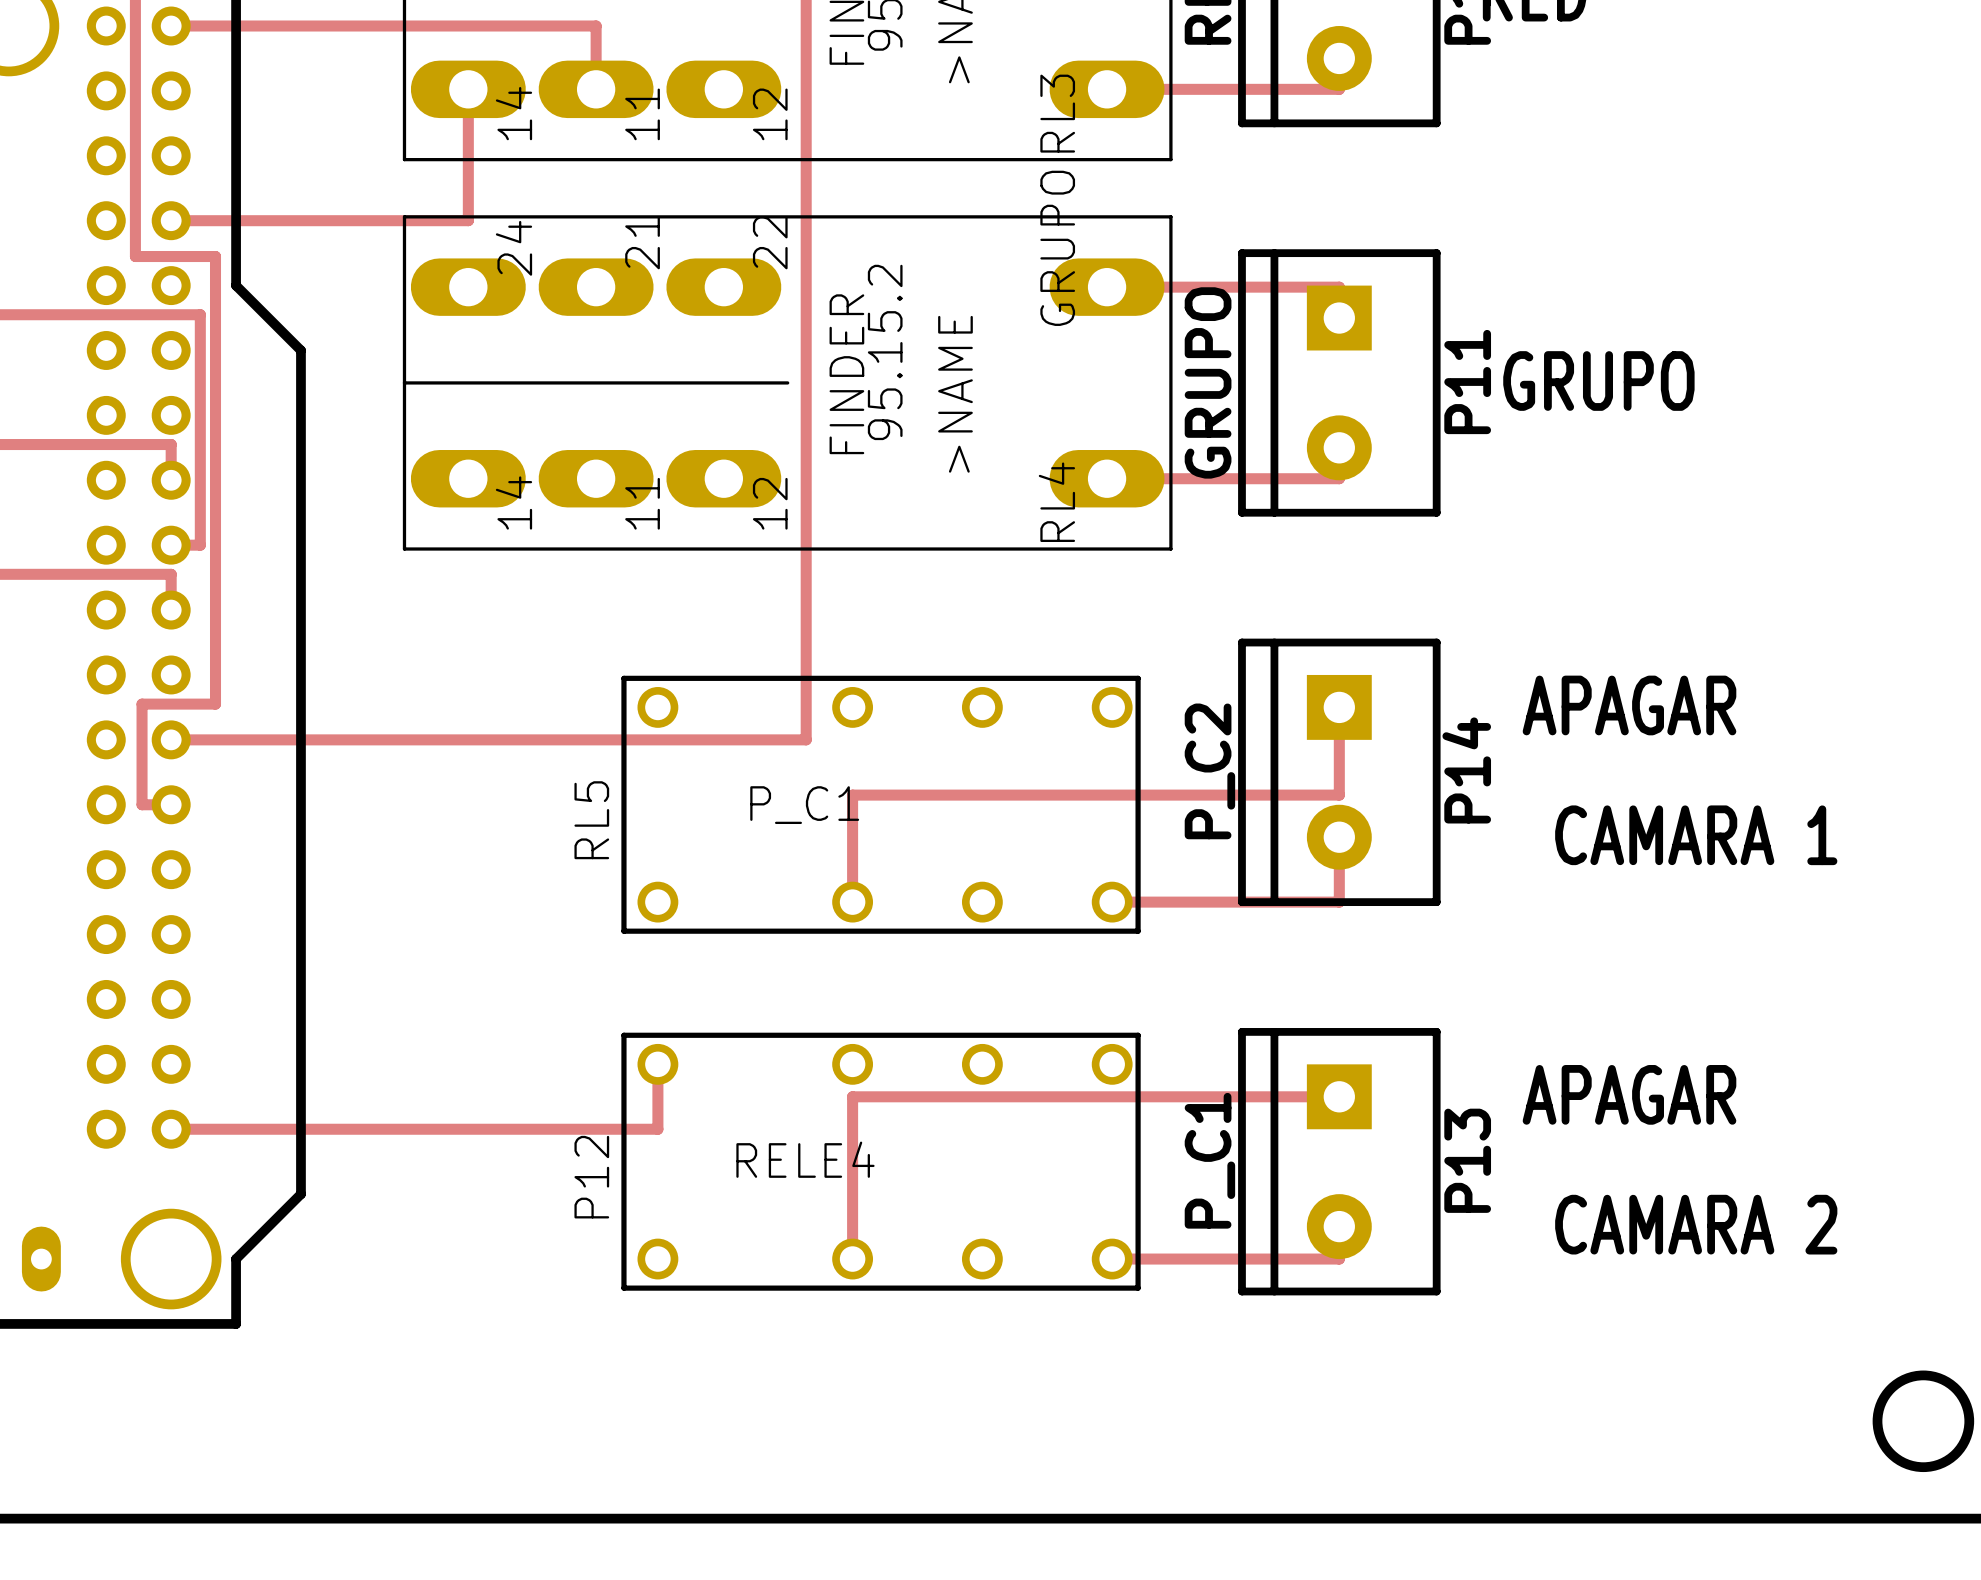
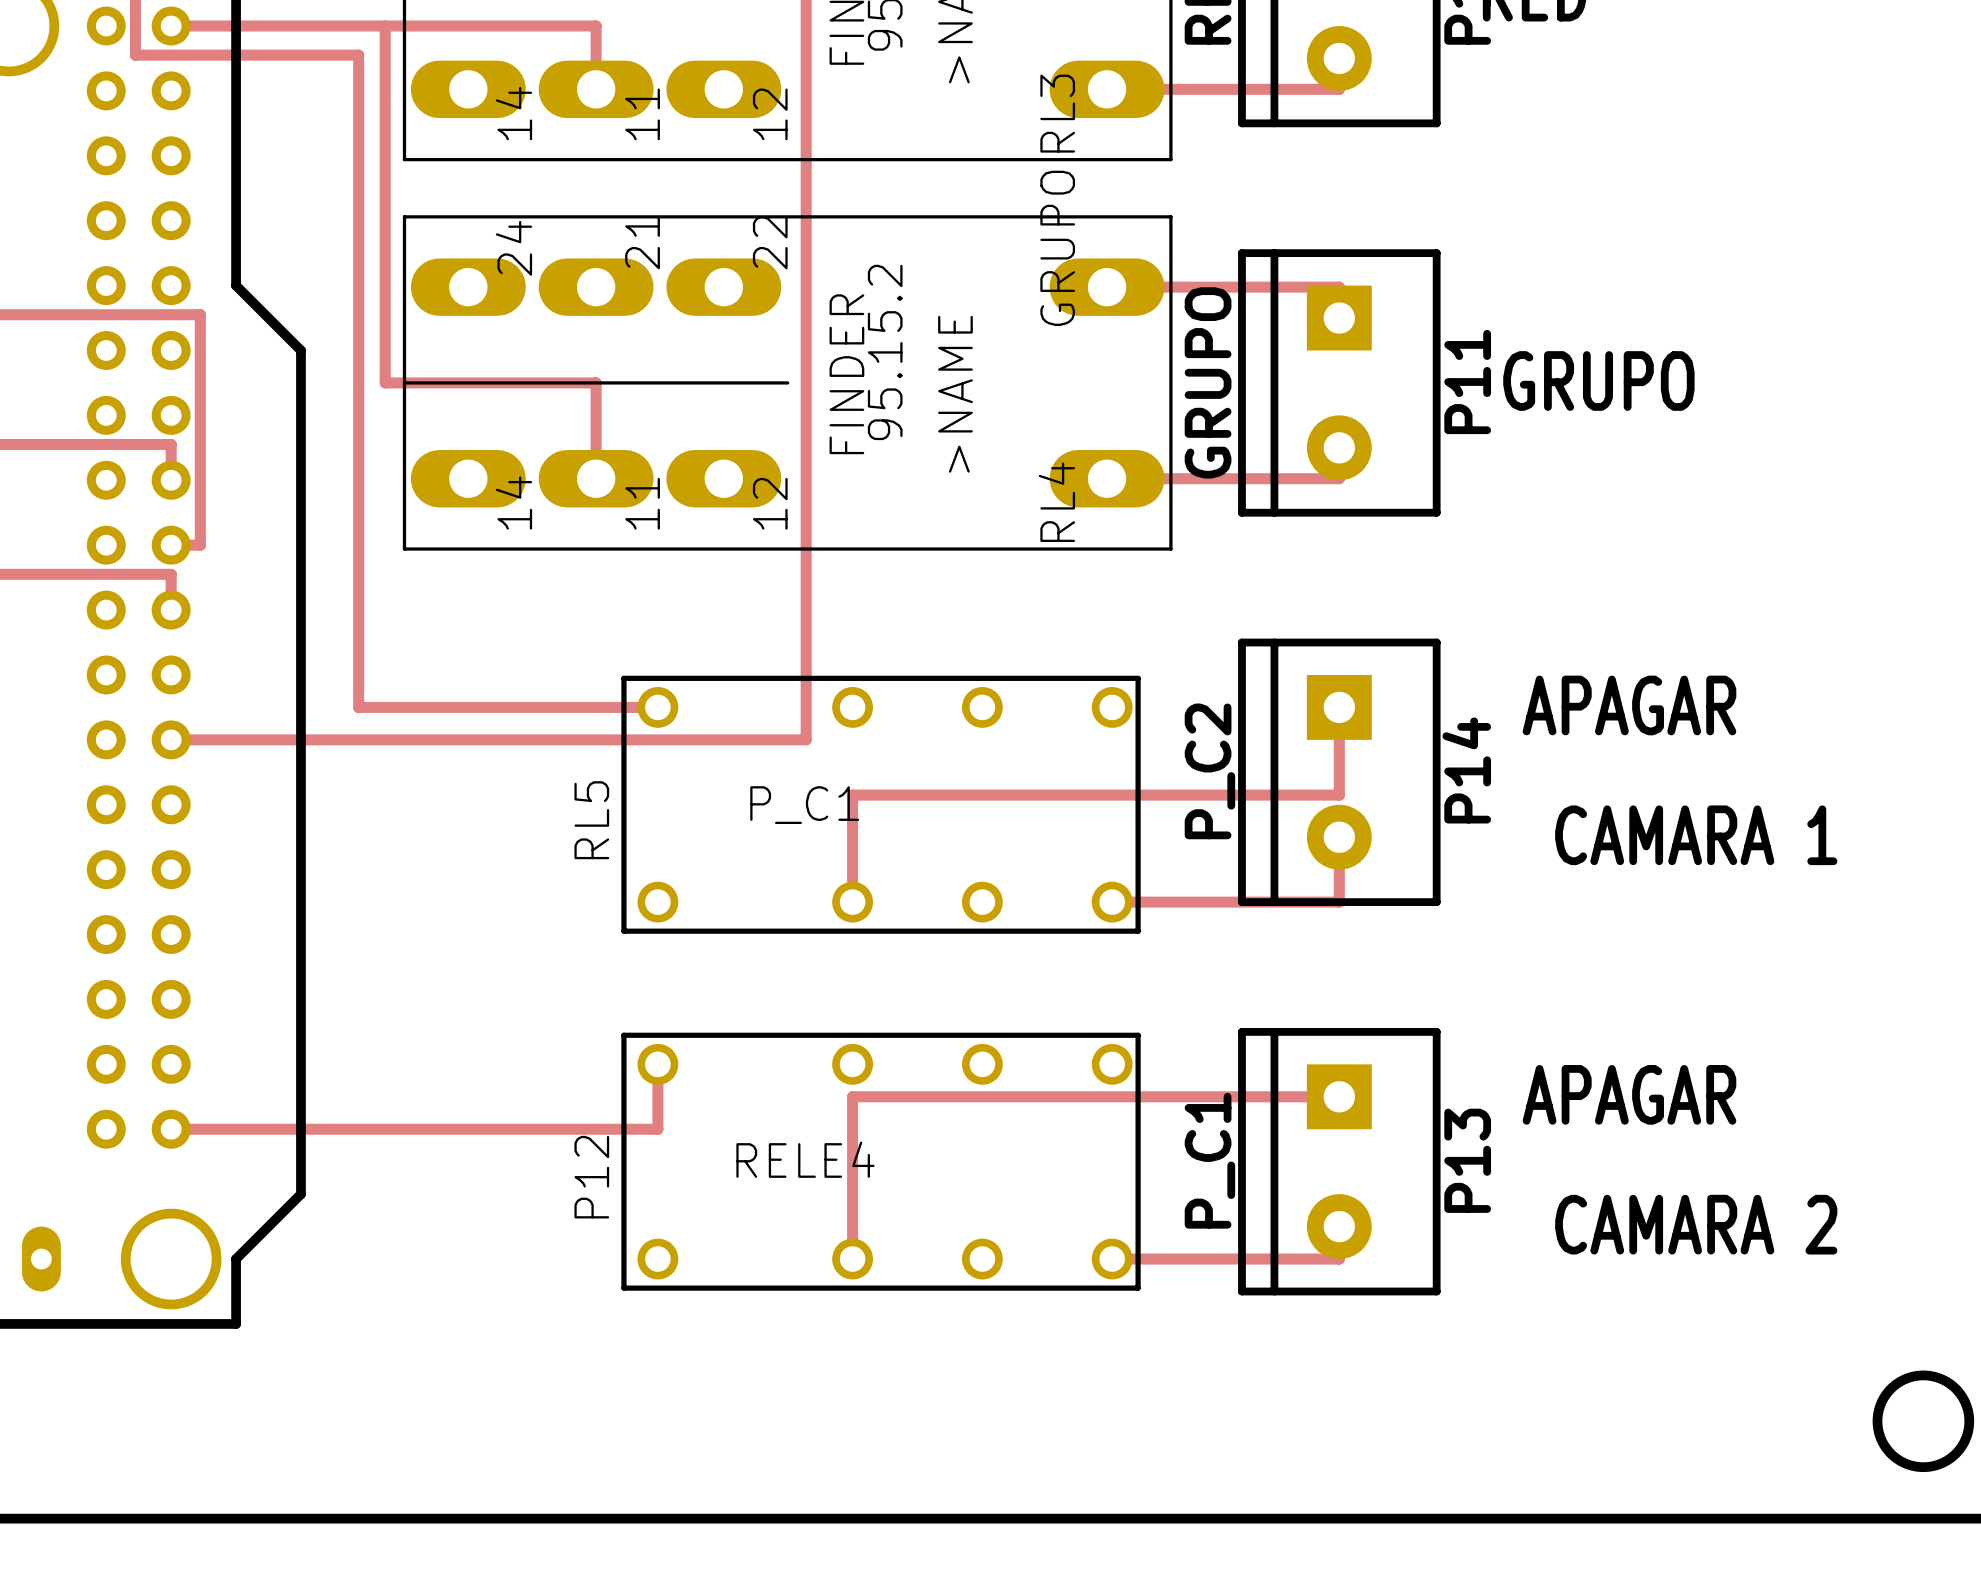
track: none -> (385, 26) (385, 382) (596, 382) (596, 478)
track: (135, 55) (135, 256) (215, 256) (215, 704) (142, 704) (142, 804) (171, 804) -> (135, 55) (358, 55) (358, 707) (657, 707)
track: (468, 89) (468, 220) (171, 220) -> none

